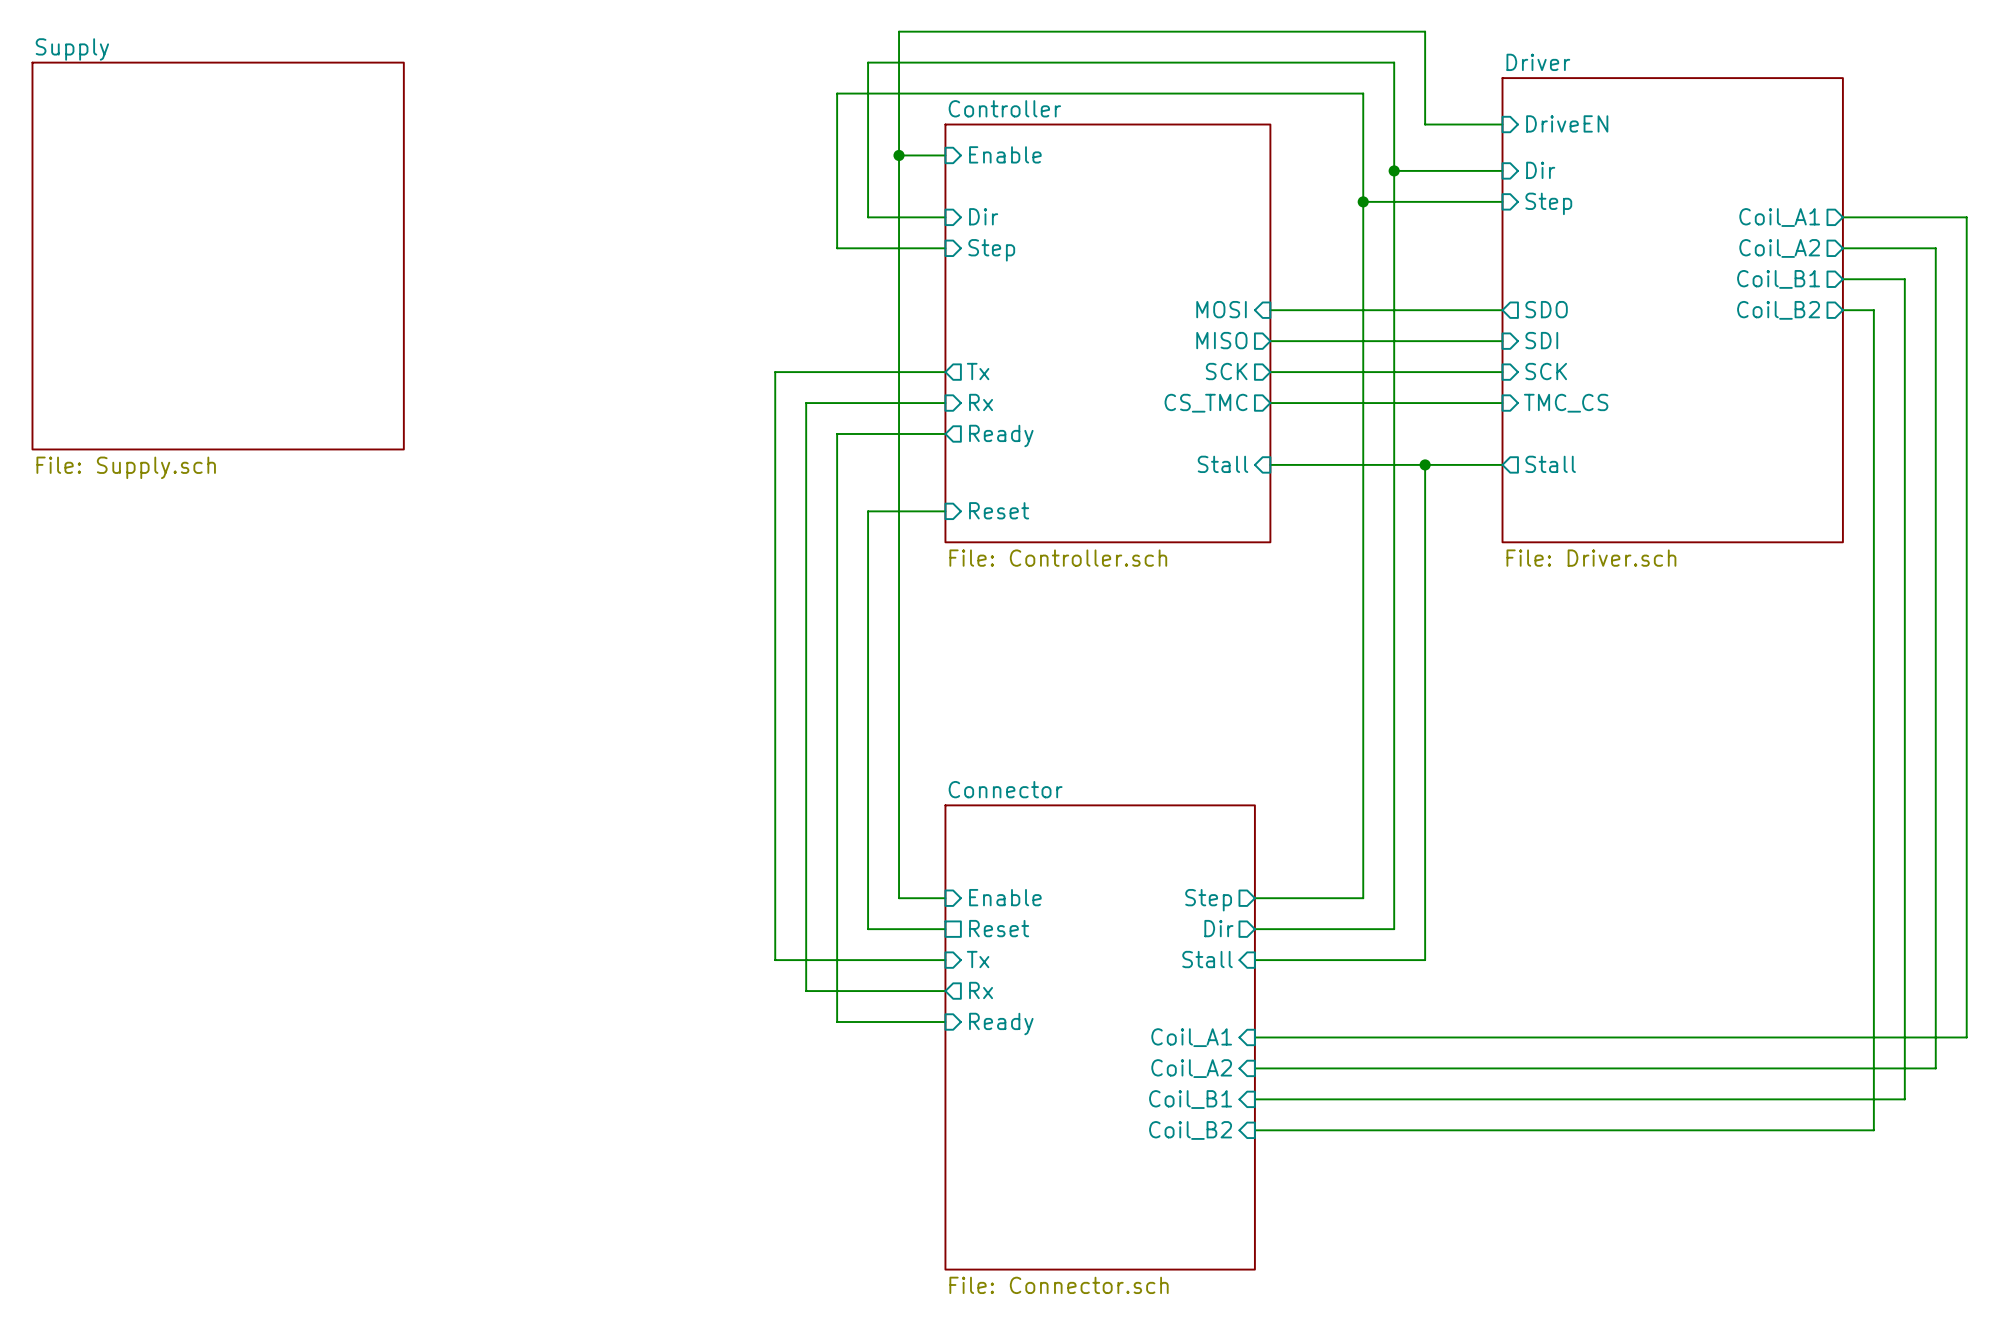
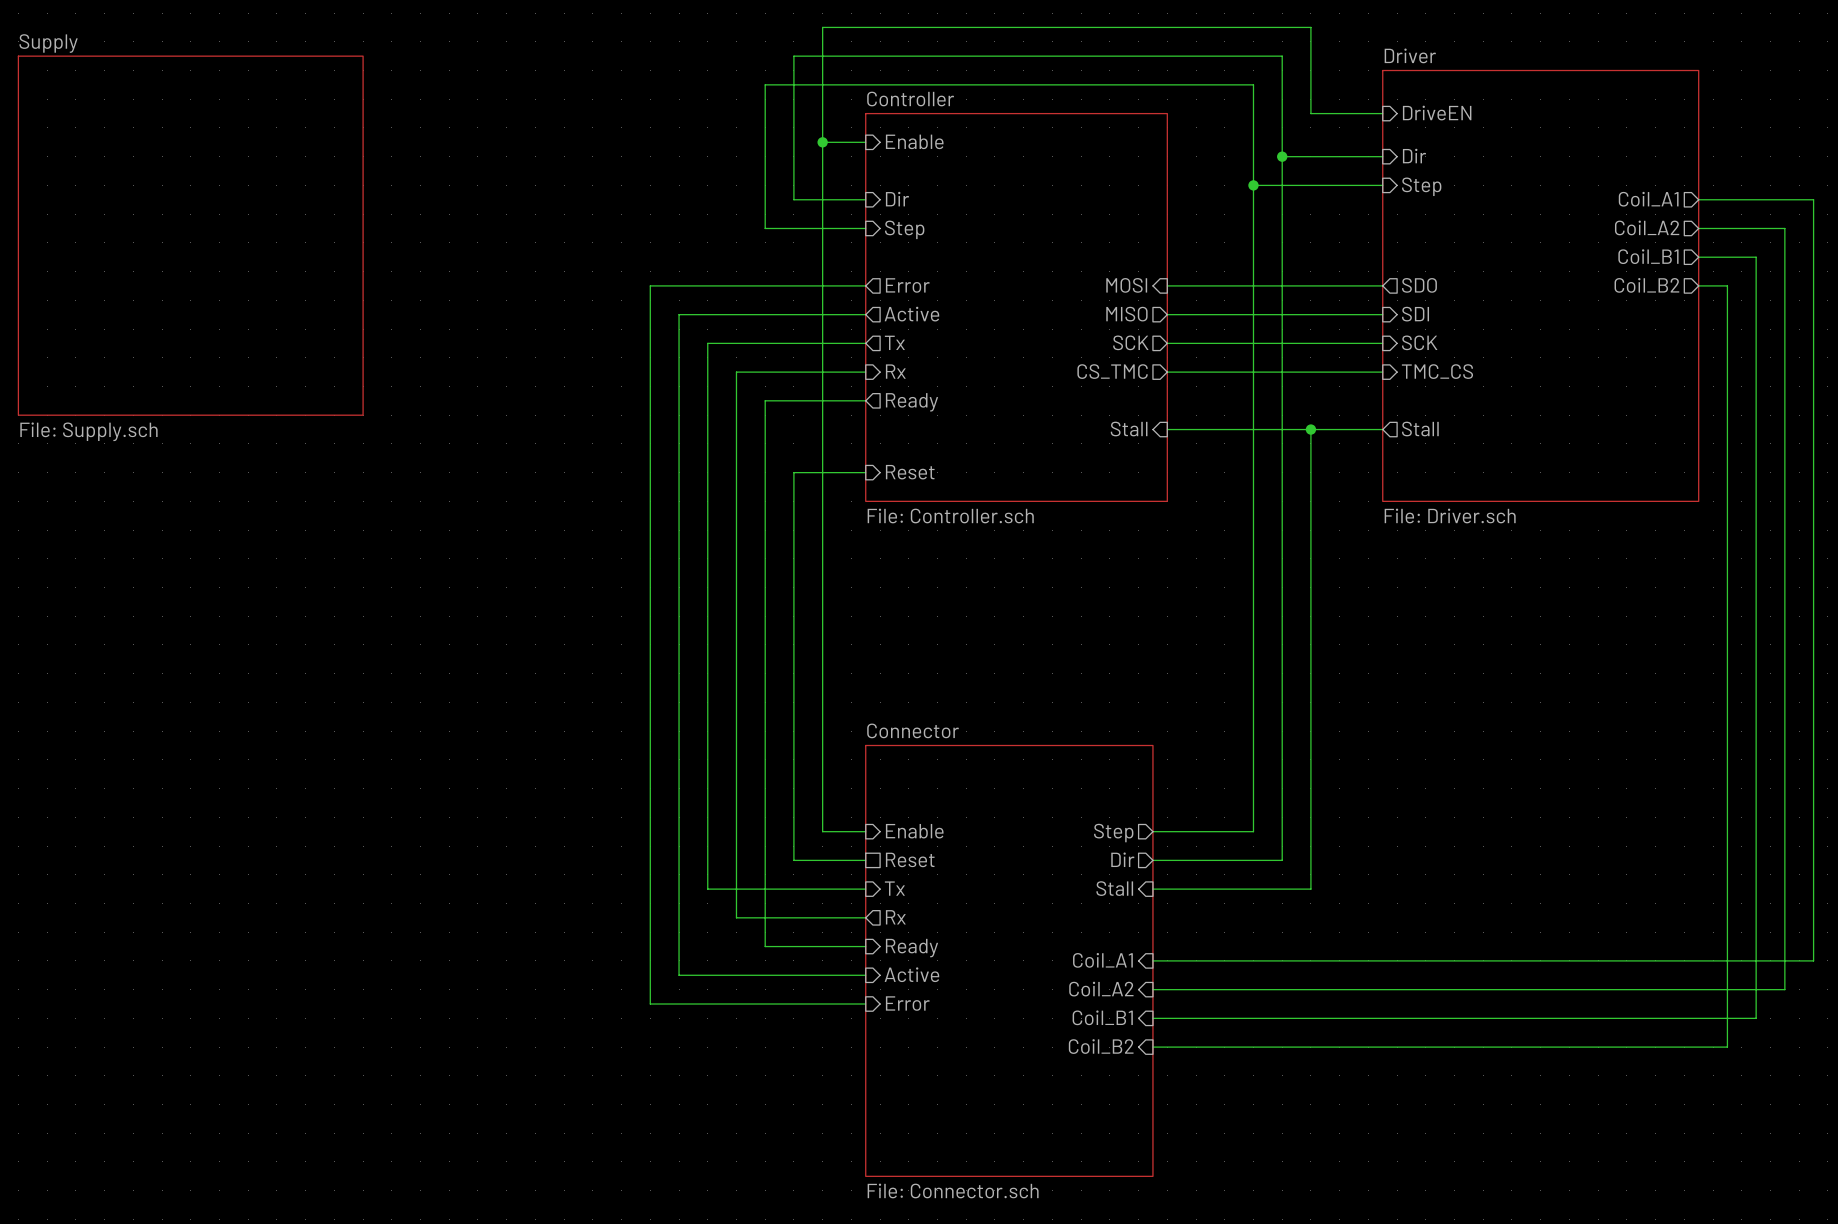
sheet pin: none -> Error (907, 285)
wire: none -> (865, 285) (650, 285) (650, 1004) (865, 1004)
sheet pin: none -> Active (911, 314)
wire: none -> (865, 314) (679, 314) (679, 975) (865, 975)
sheet pin: none -> Active (911, 974)
sheet pin: none -> Error (907, 1003)

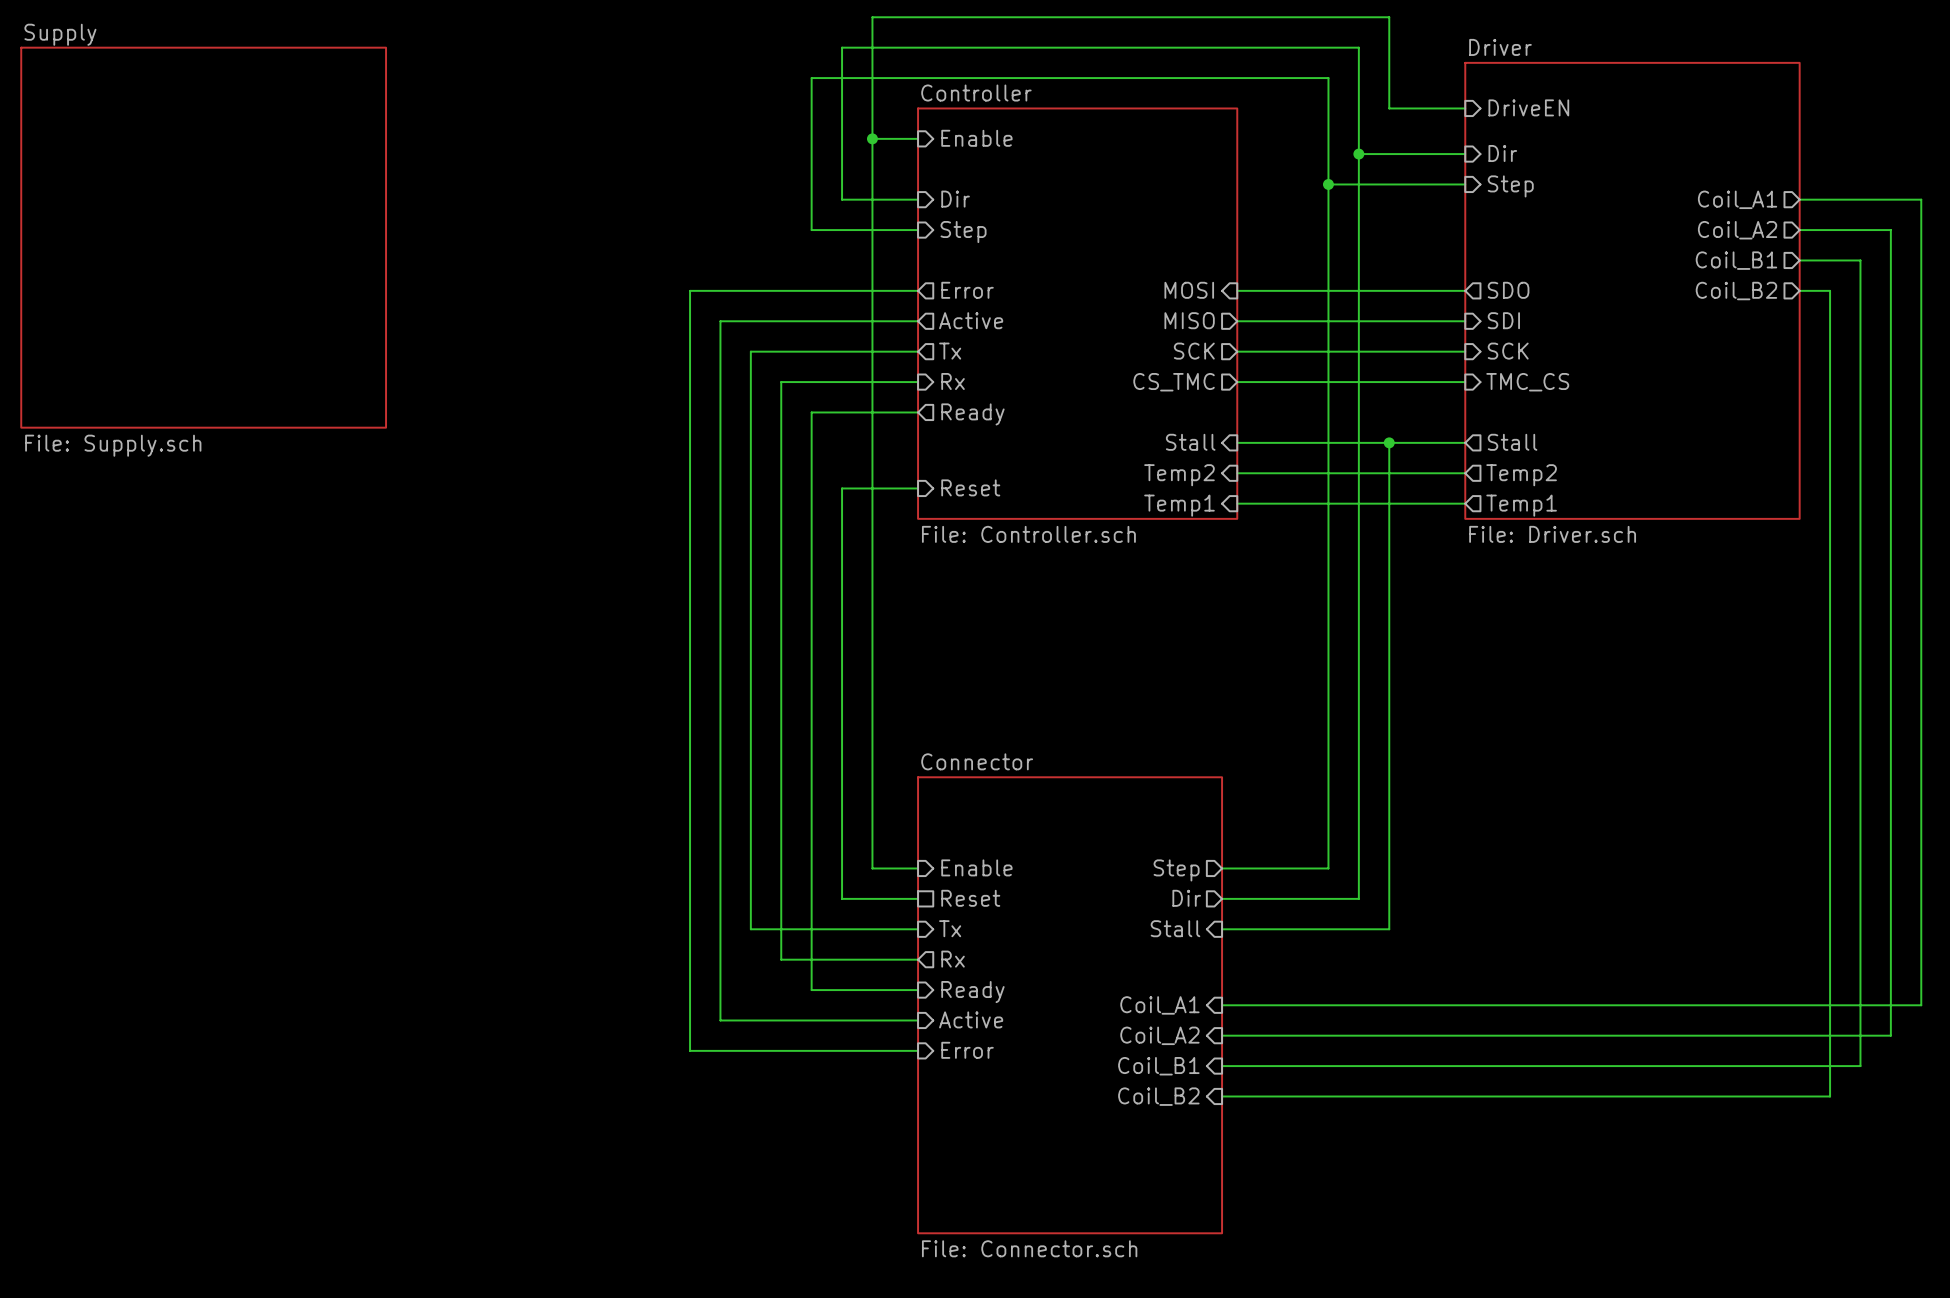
wire: none -> (1237, 473) (1465, 473)
sheet pin: none -> Temp2 (1179, 475)
sheet pin: none -> Temp2 (1521, 475)
wire: none -> (1237, 503) (1465, 503)
sheet pin: none -> Temp1 (1179, 505)
sheet pin: none -> Temp1 (1521, 505)

